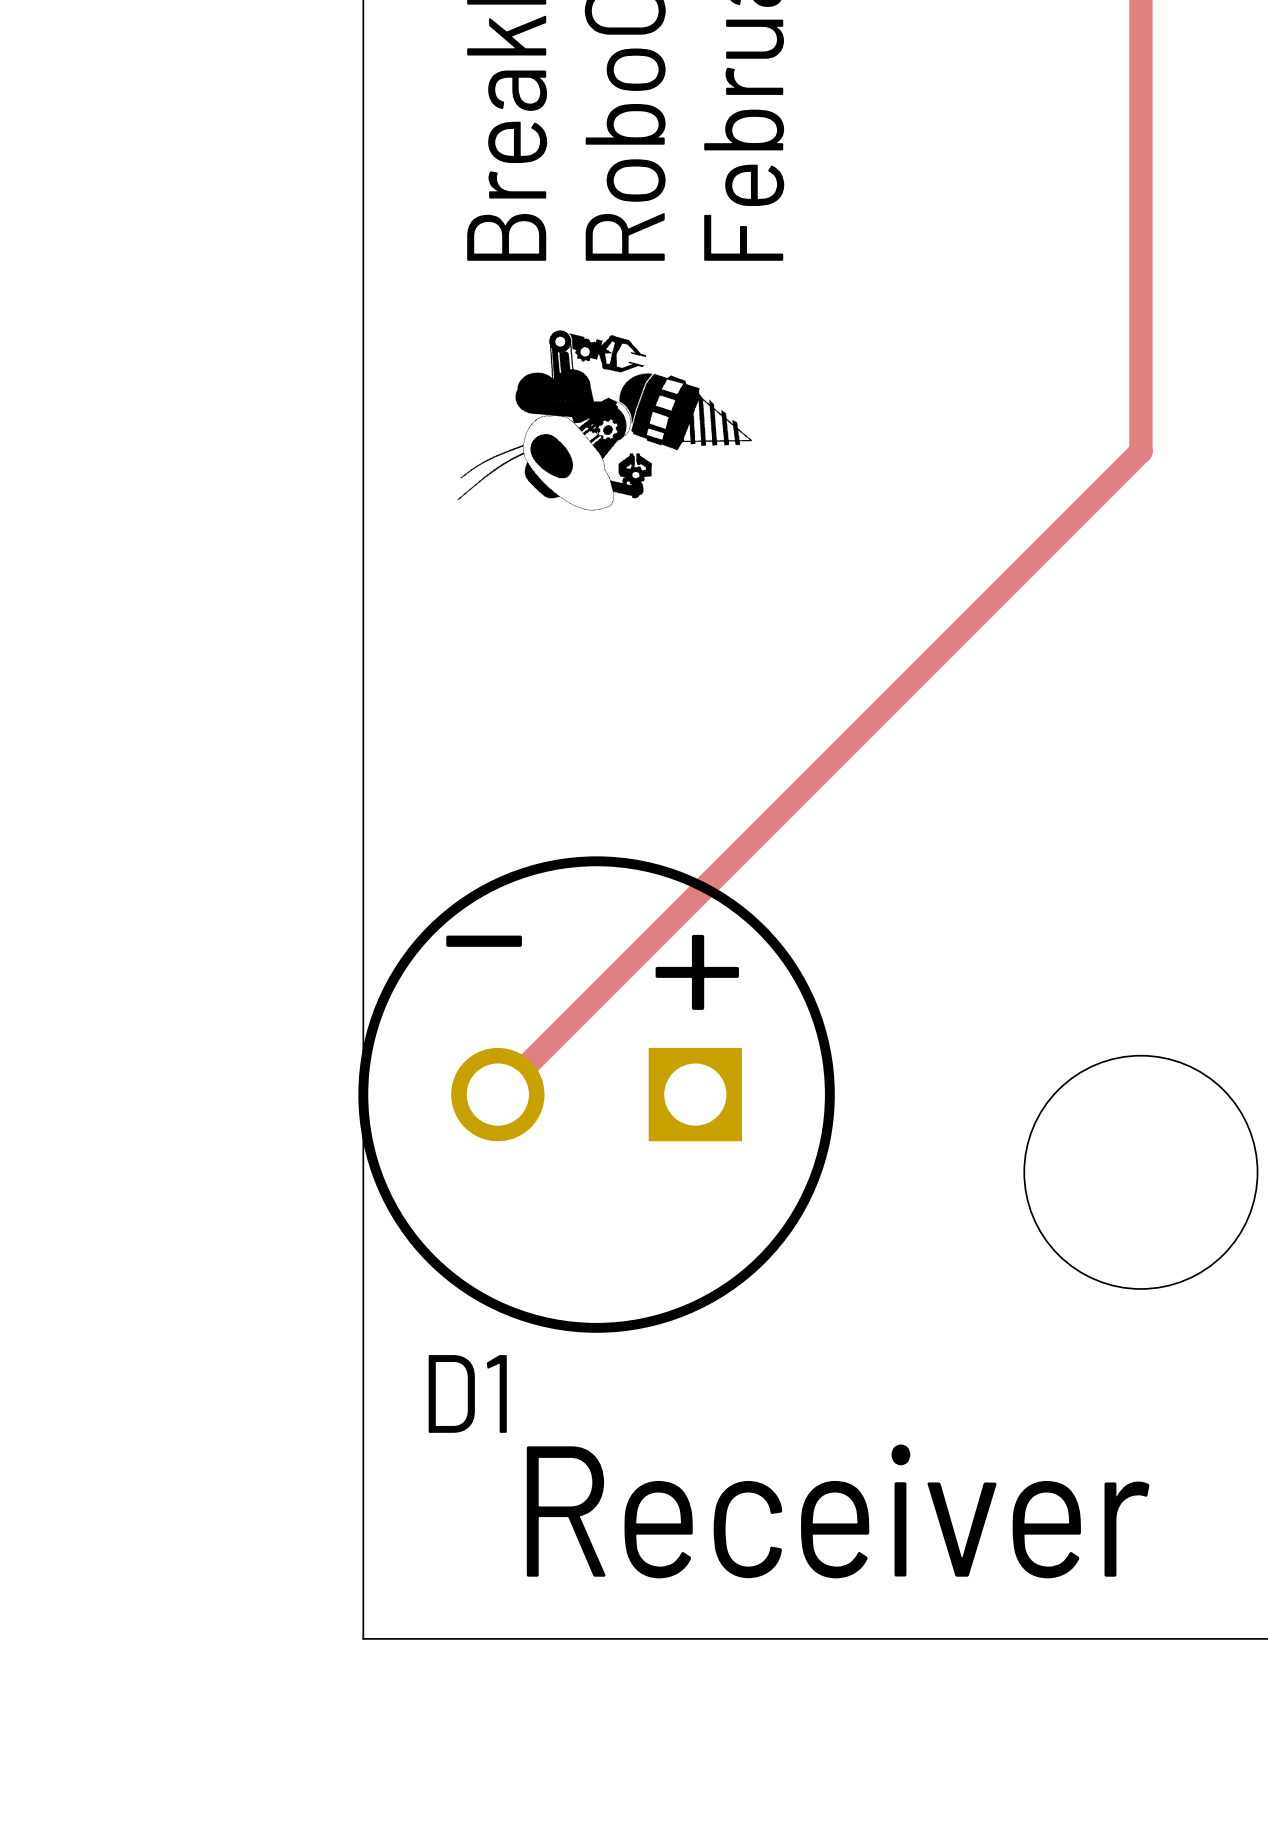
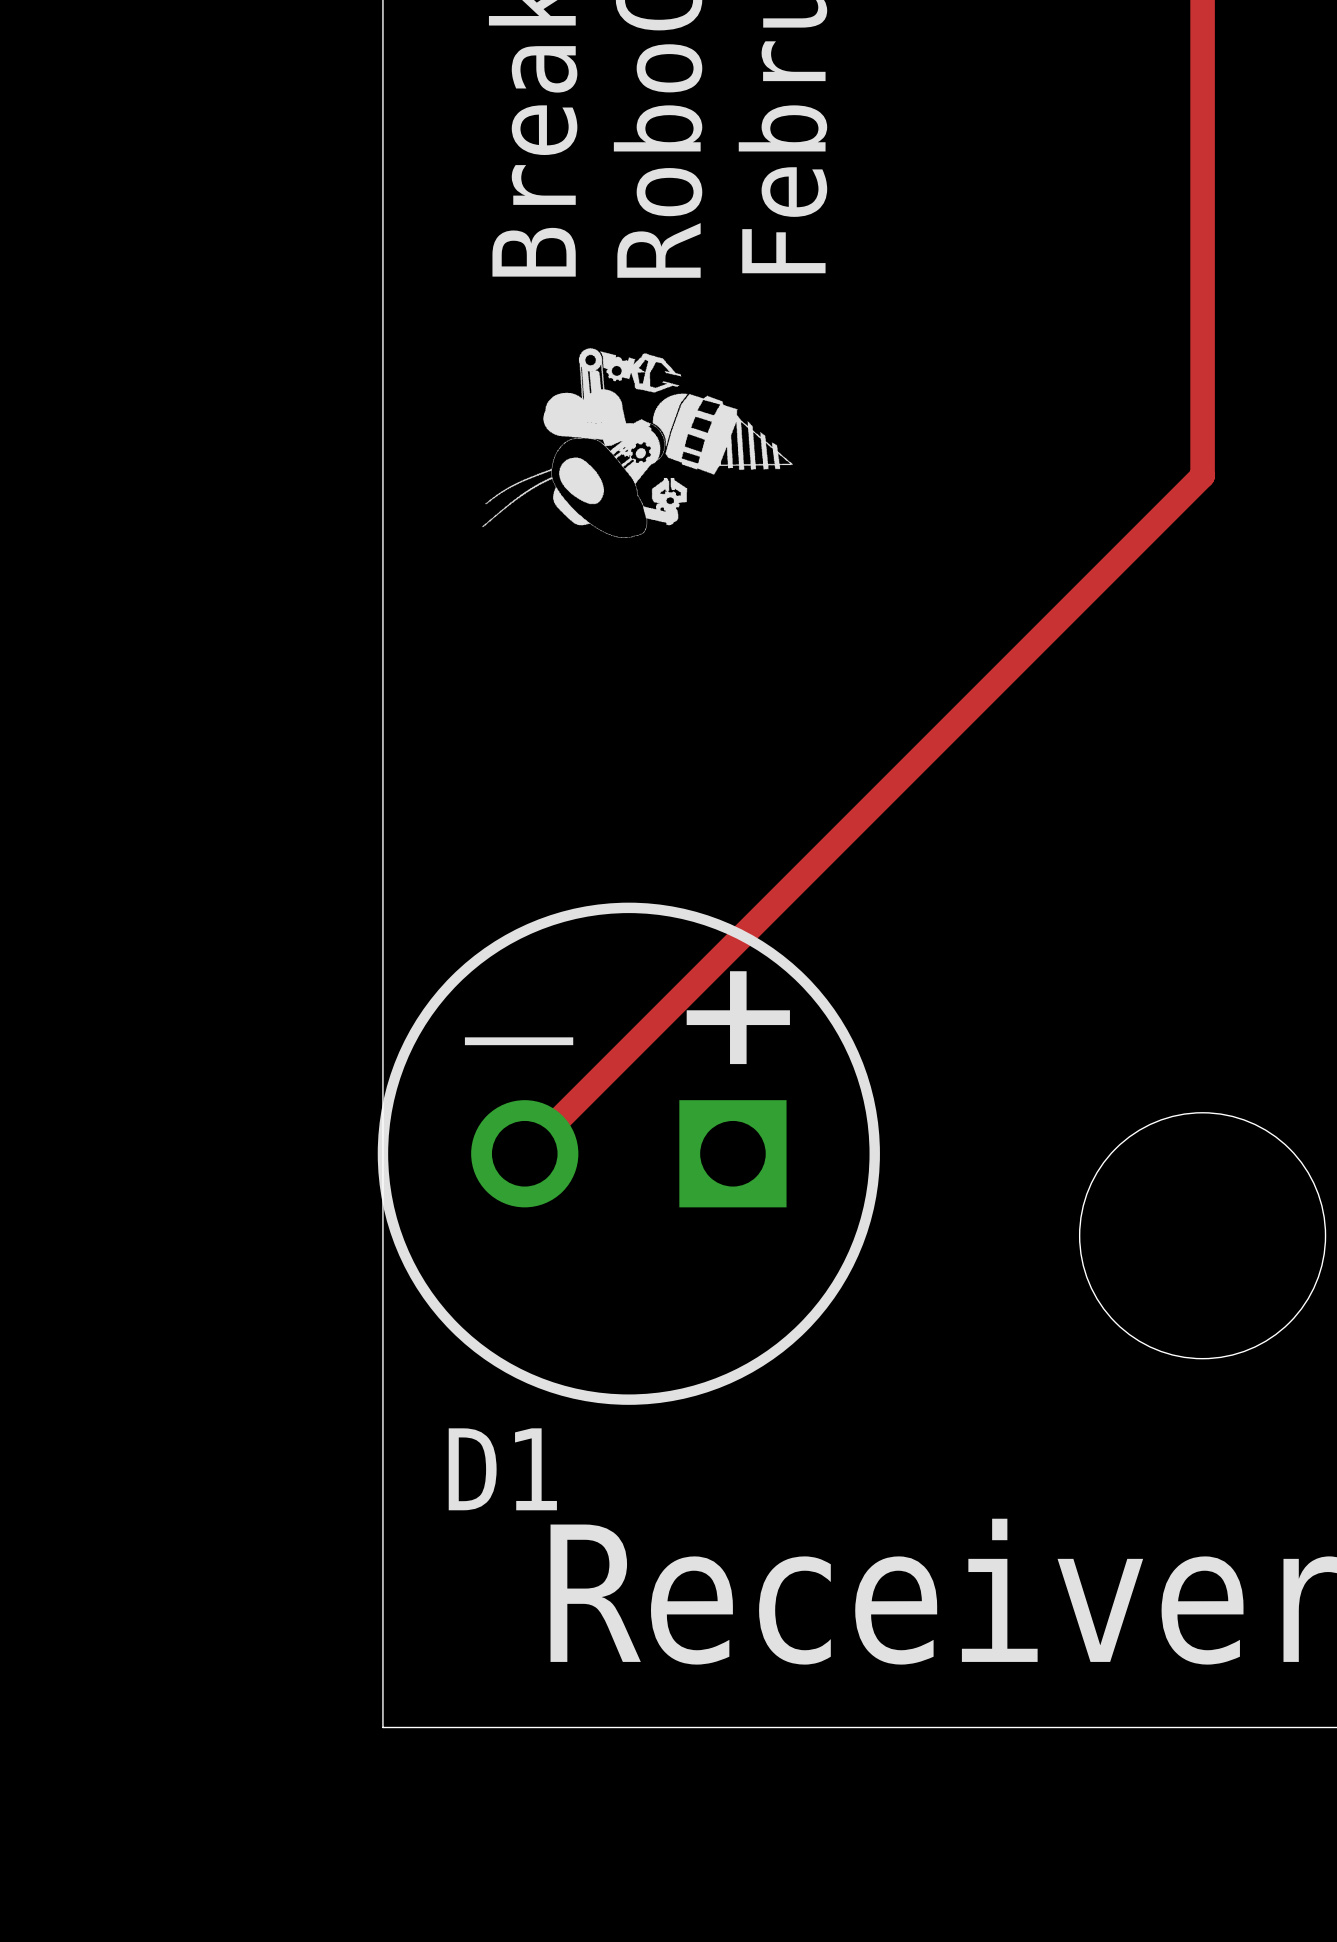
D1 footprint: [358, 856, 835, 1333] -> [377, 902, 880, 1405]

